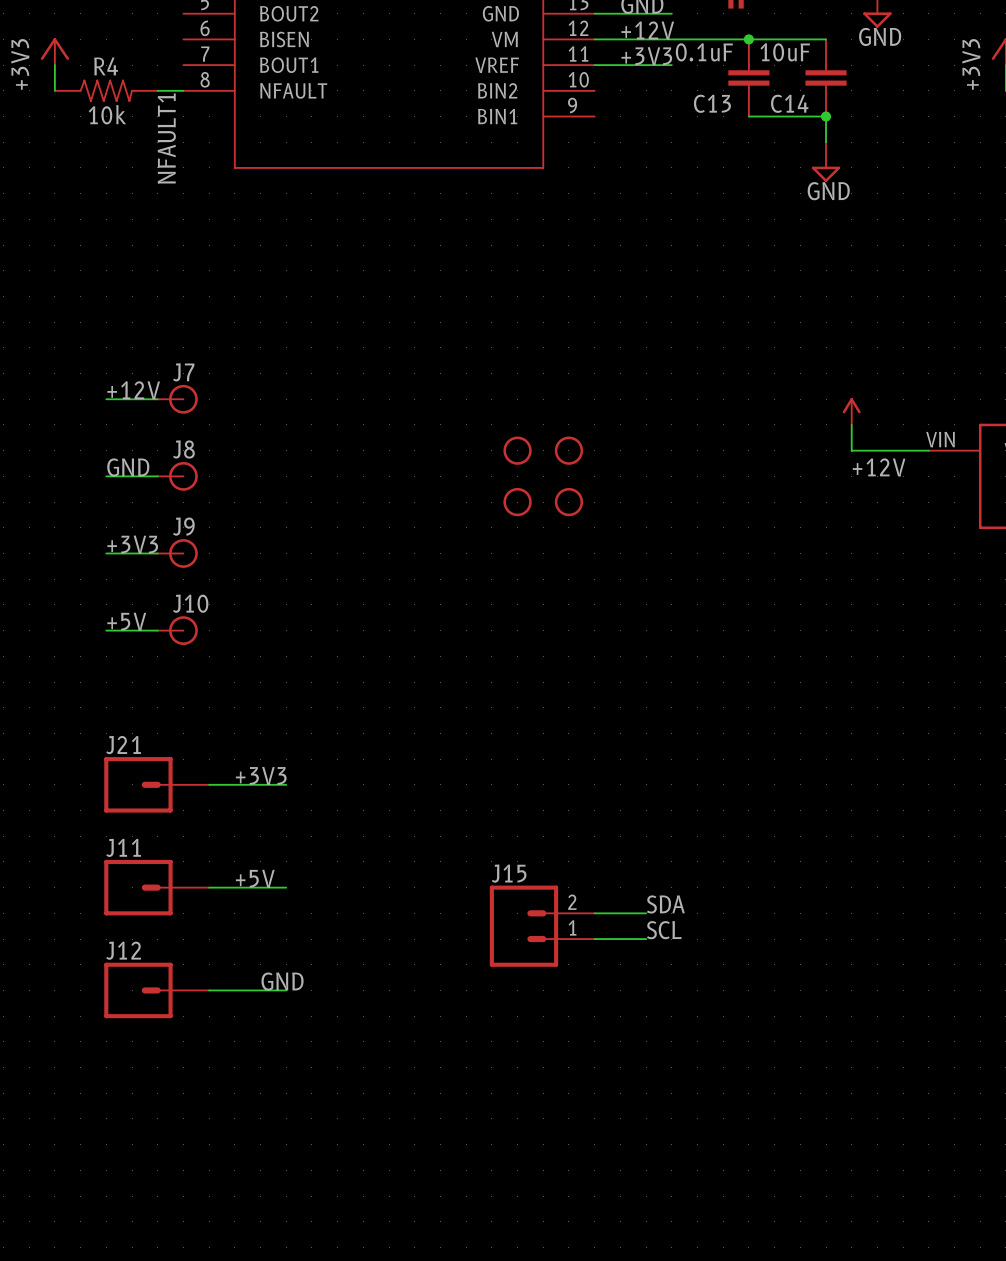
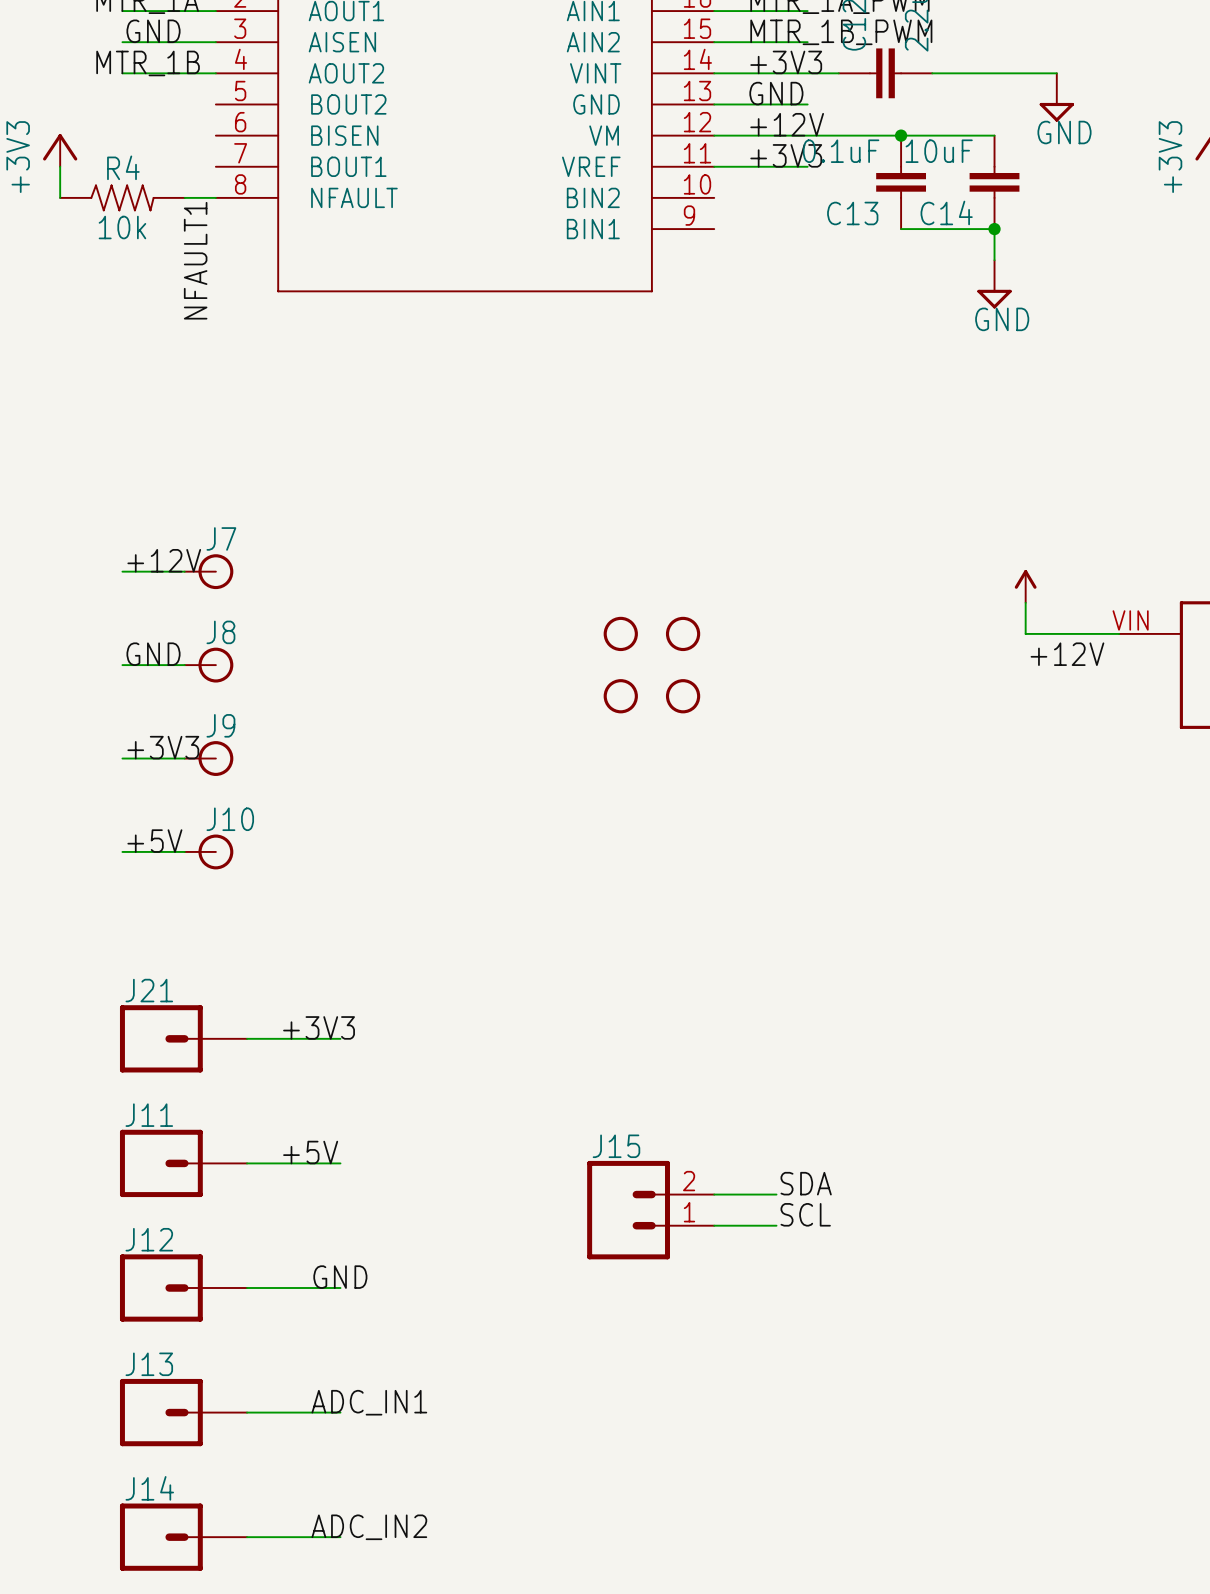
label: none -> ADC_IN1 (369, 1402)
J13: none -> (183, 1412)
wire: none -> (247, 1412) (340, 1412)
label: none -> ADC_IN2 (369, 1527)
J14: none -> (183, 1537)
wire: none -> (247, 1537) (340, 1537)

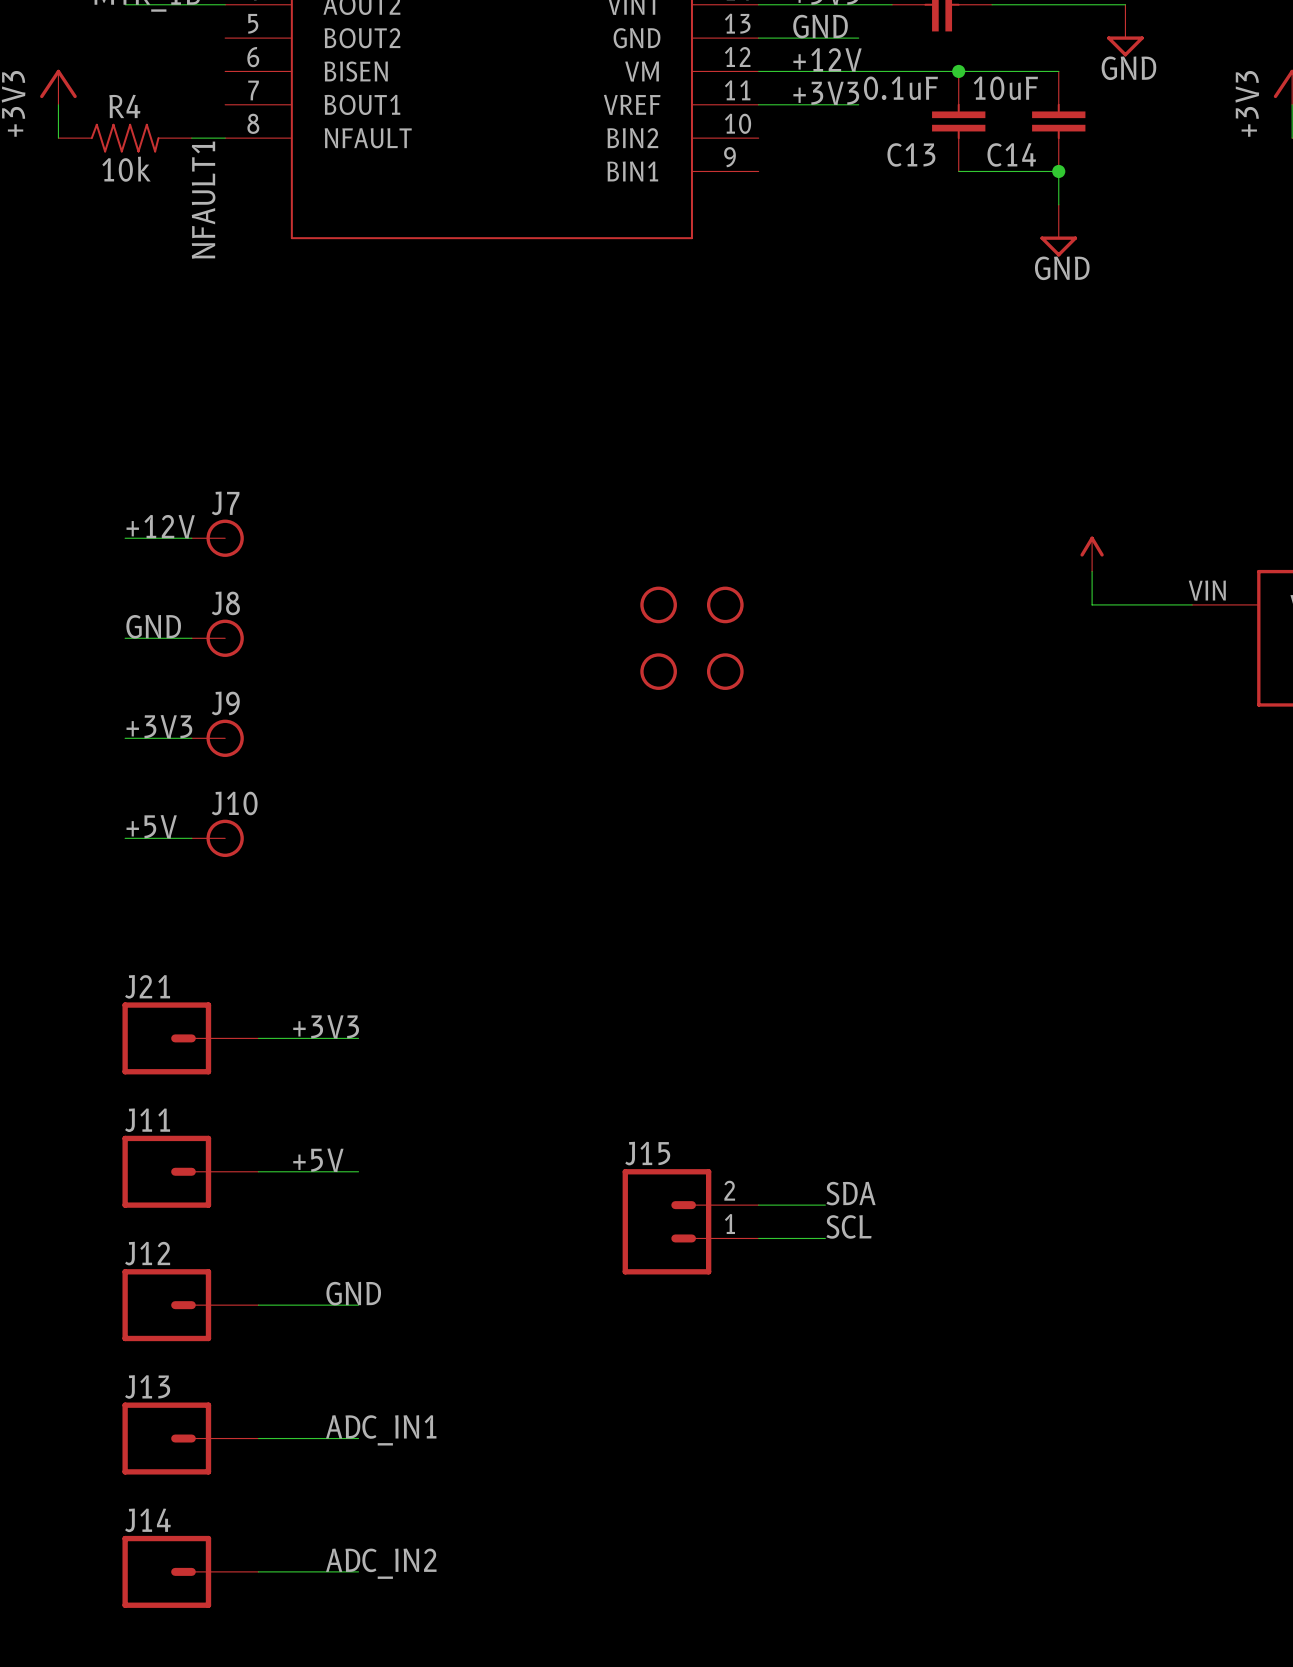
label: +12V (1067, 654) -> none

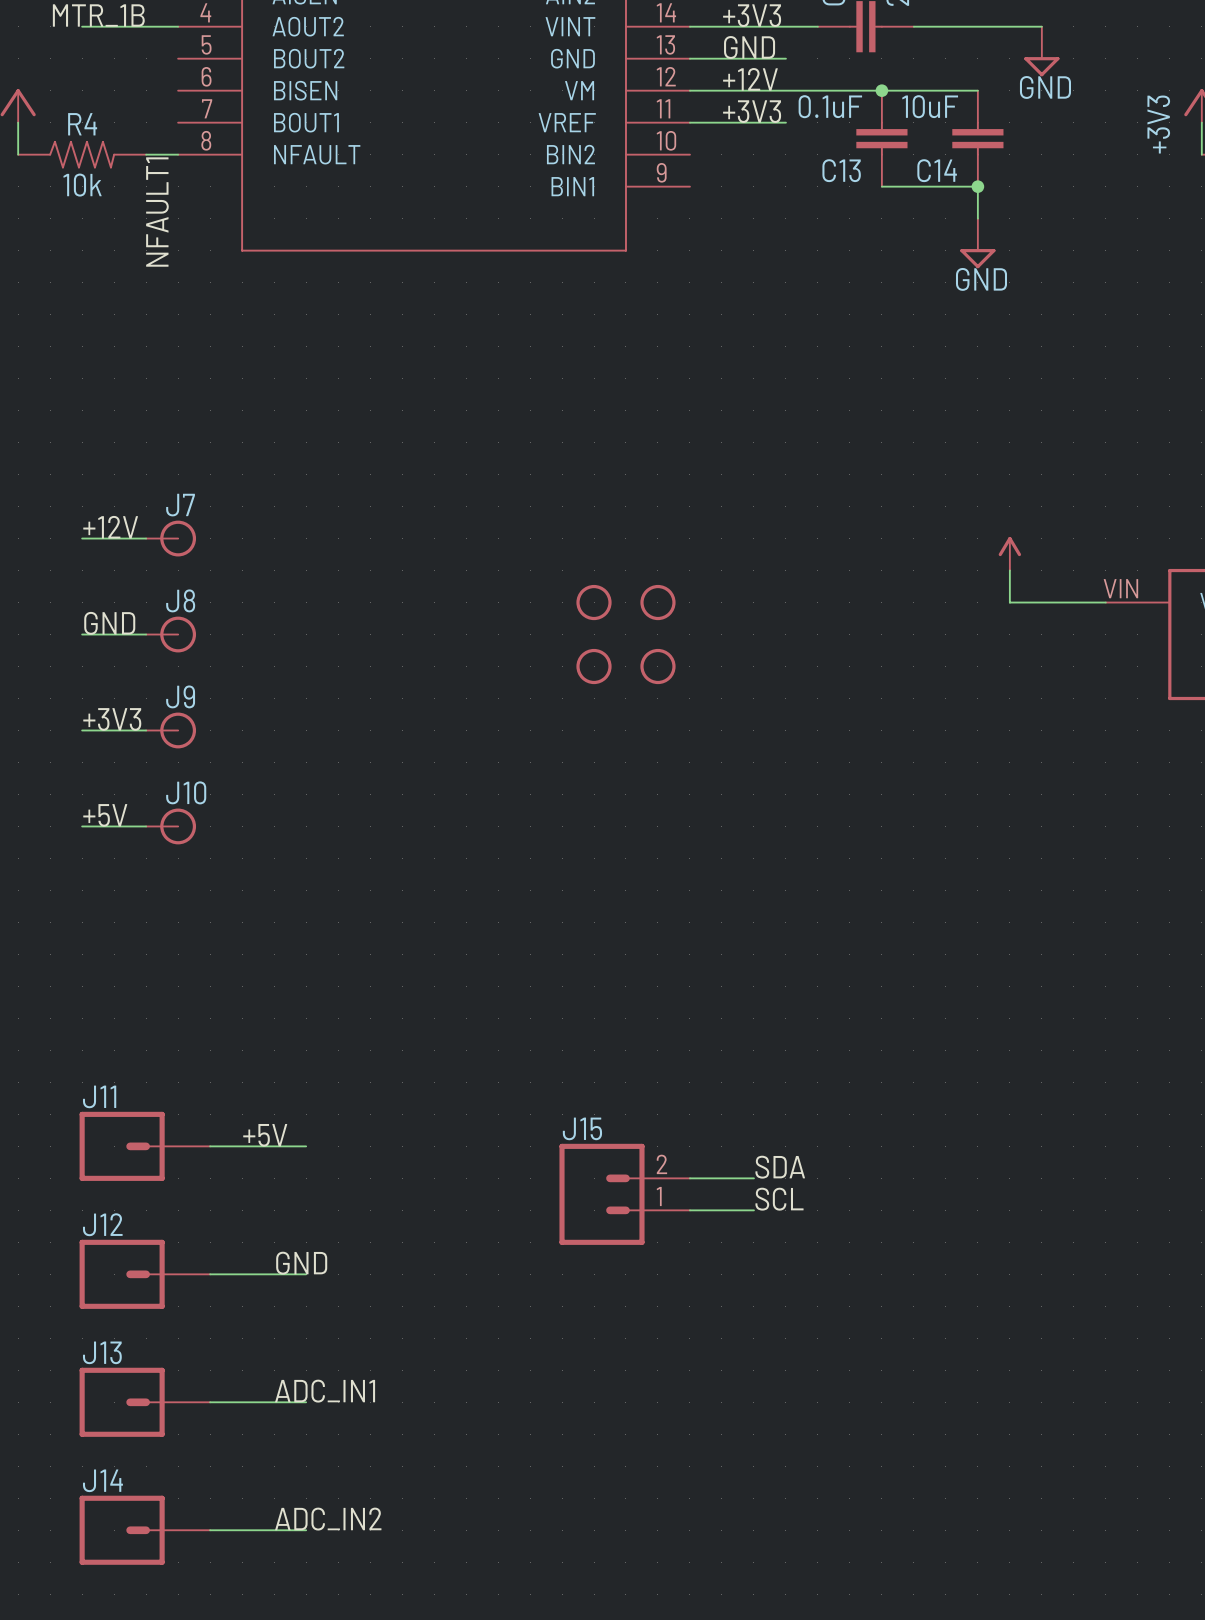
label: +3V3 (326, 1026) -> none
J21: (190, 1038) -> none
wire: (258, 1038) (358, 1038) -> none

